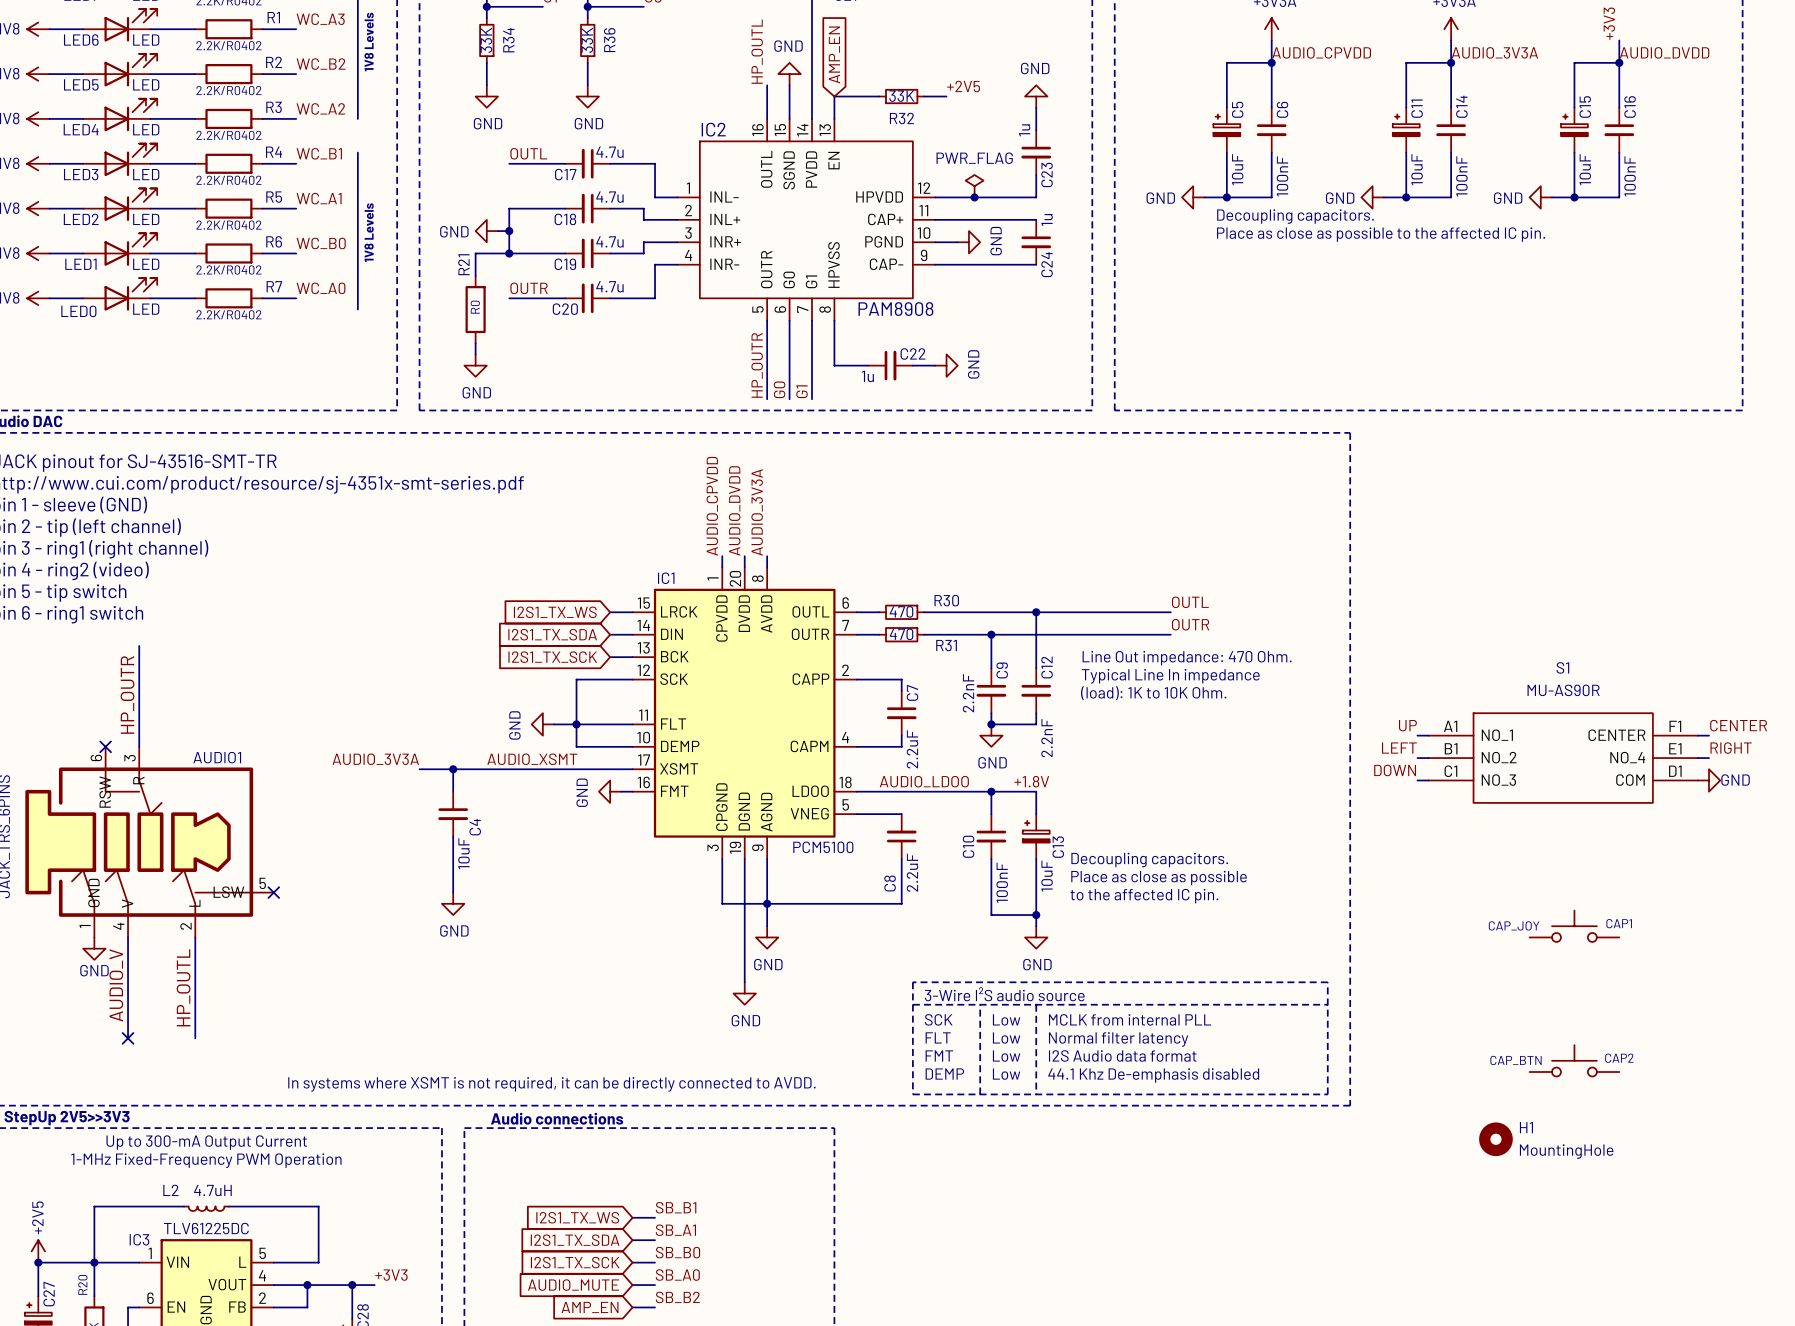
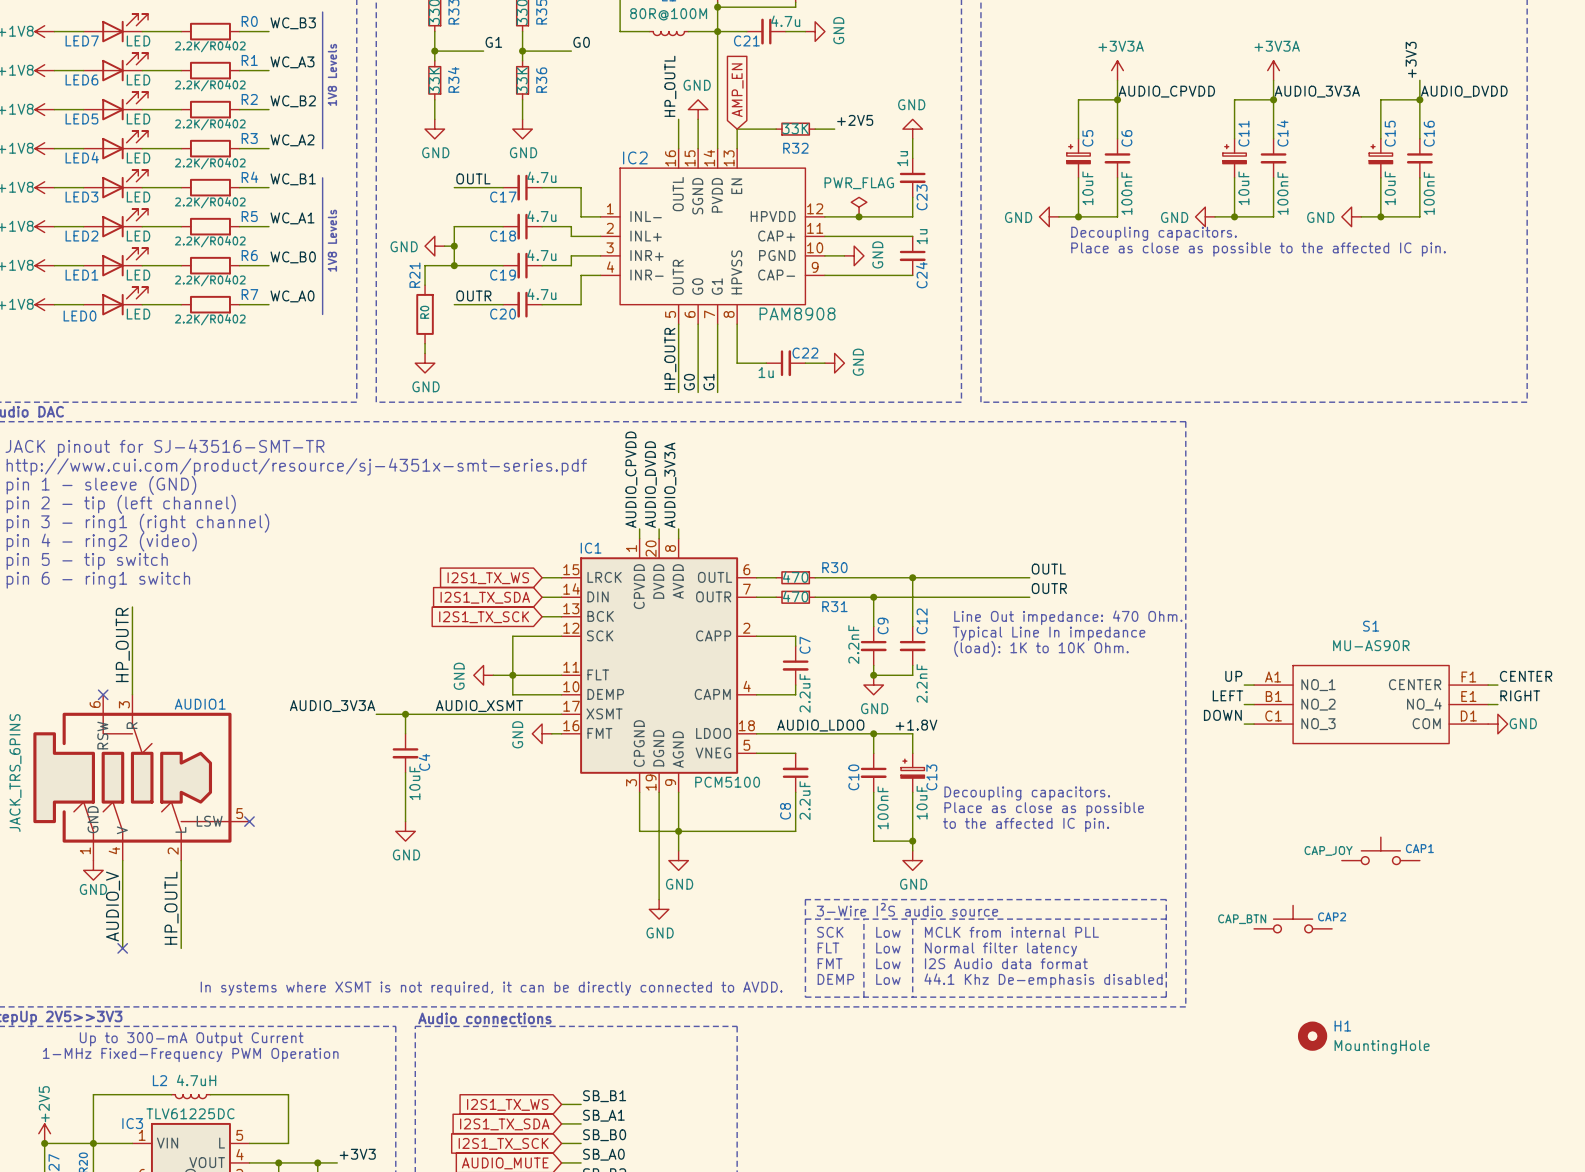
CAP2 position: (1574, 1060) -> (1293, 919)

